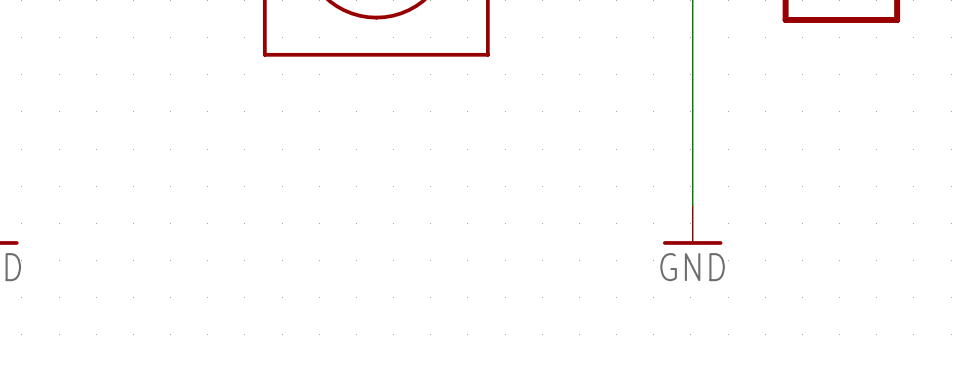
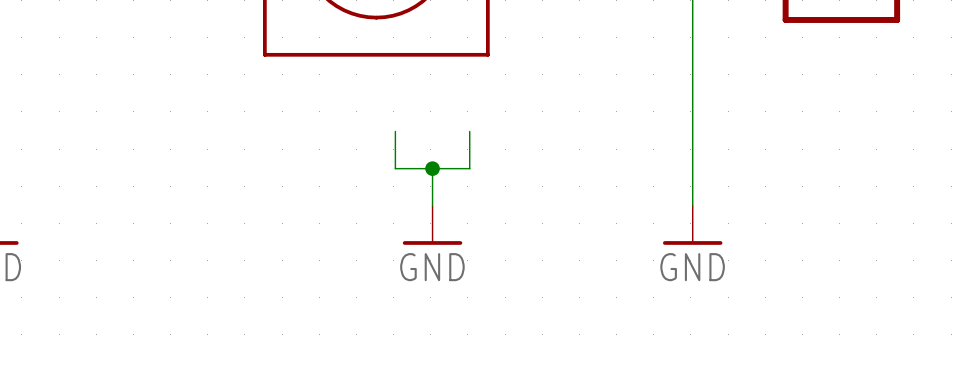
wire: none -> (395, 131) (395, 168) (469, 168) (469, 131)
wire: none -> (432, 168) (432, 205)
junction: none -> (432, 168)
power symbol: none -> GND (432, 225)

